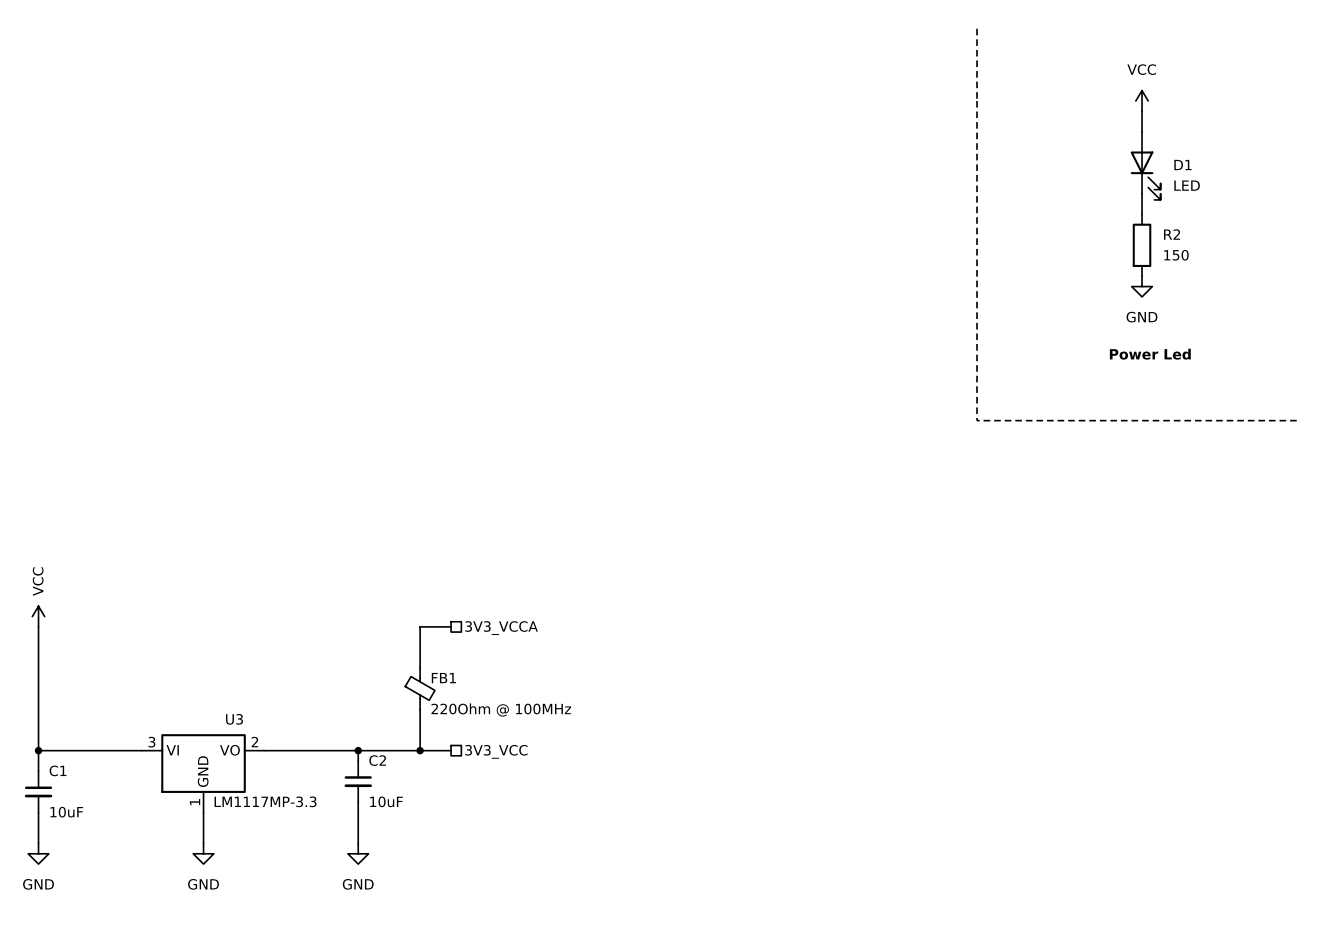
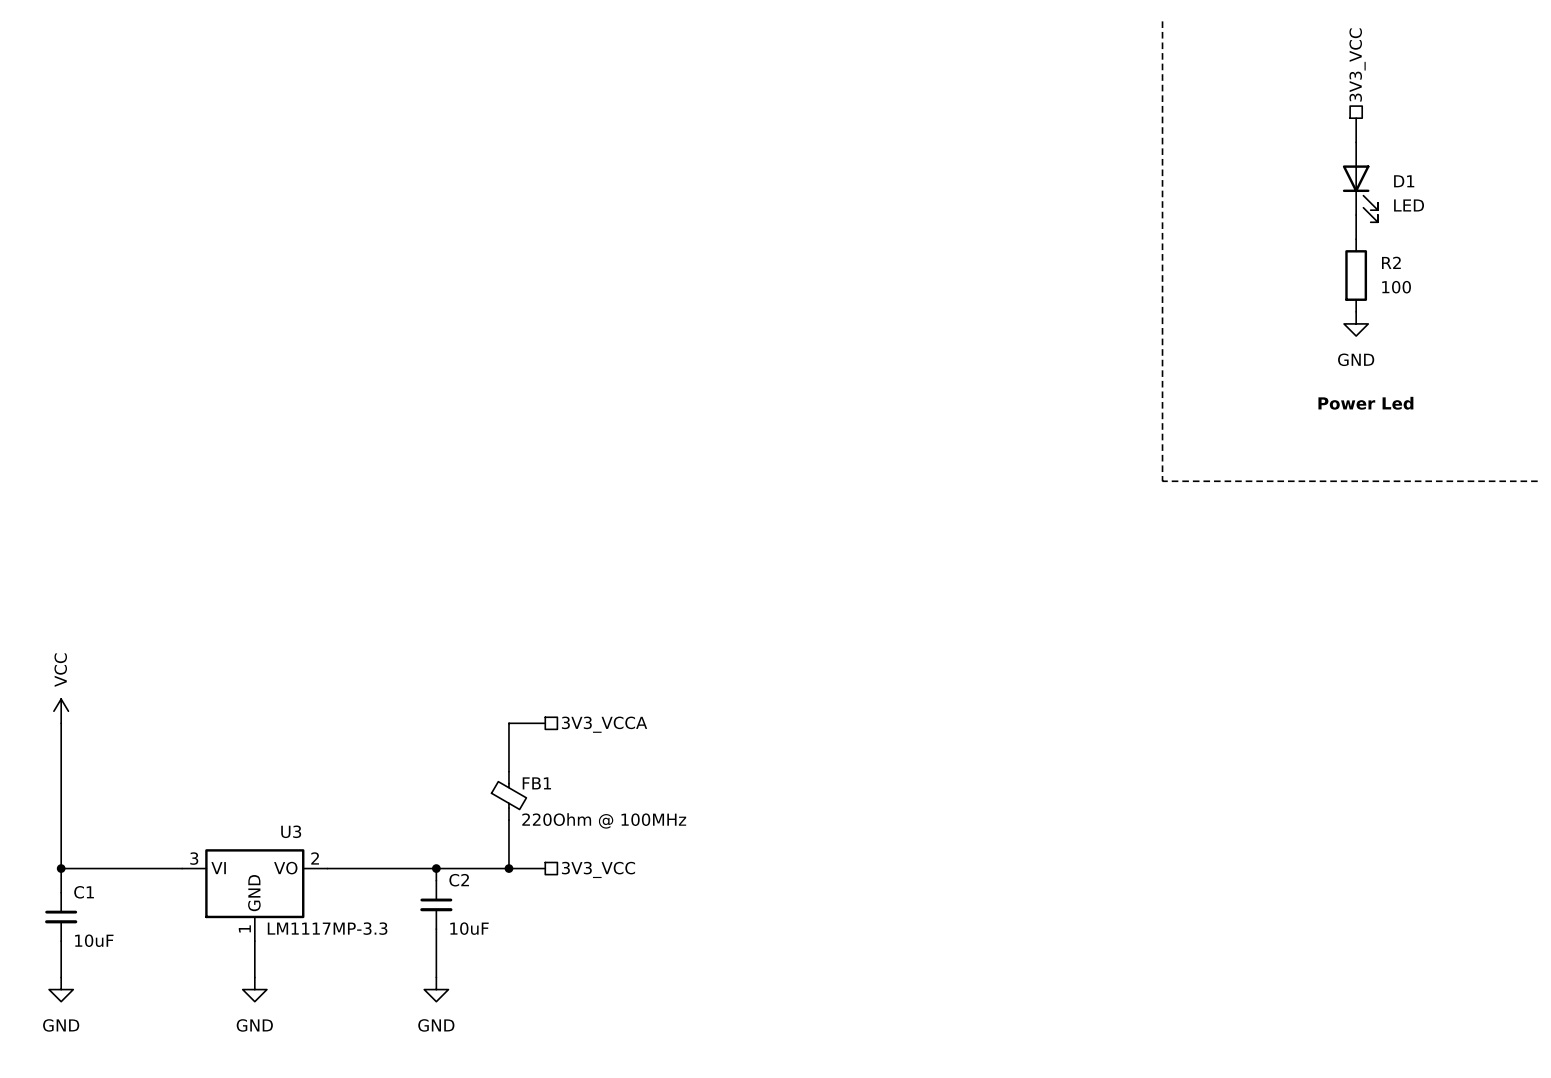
hierarchical label: none -> 3V3_VCC (1357, 64)
power symbol: VCC (1142, 100) -> none
R2 value: 150 (1176, 255) -> 100 (1396, 287)

